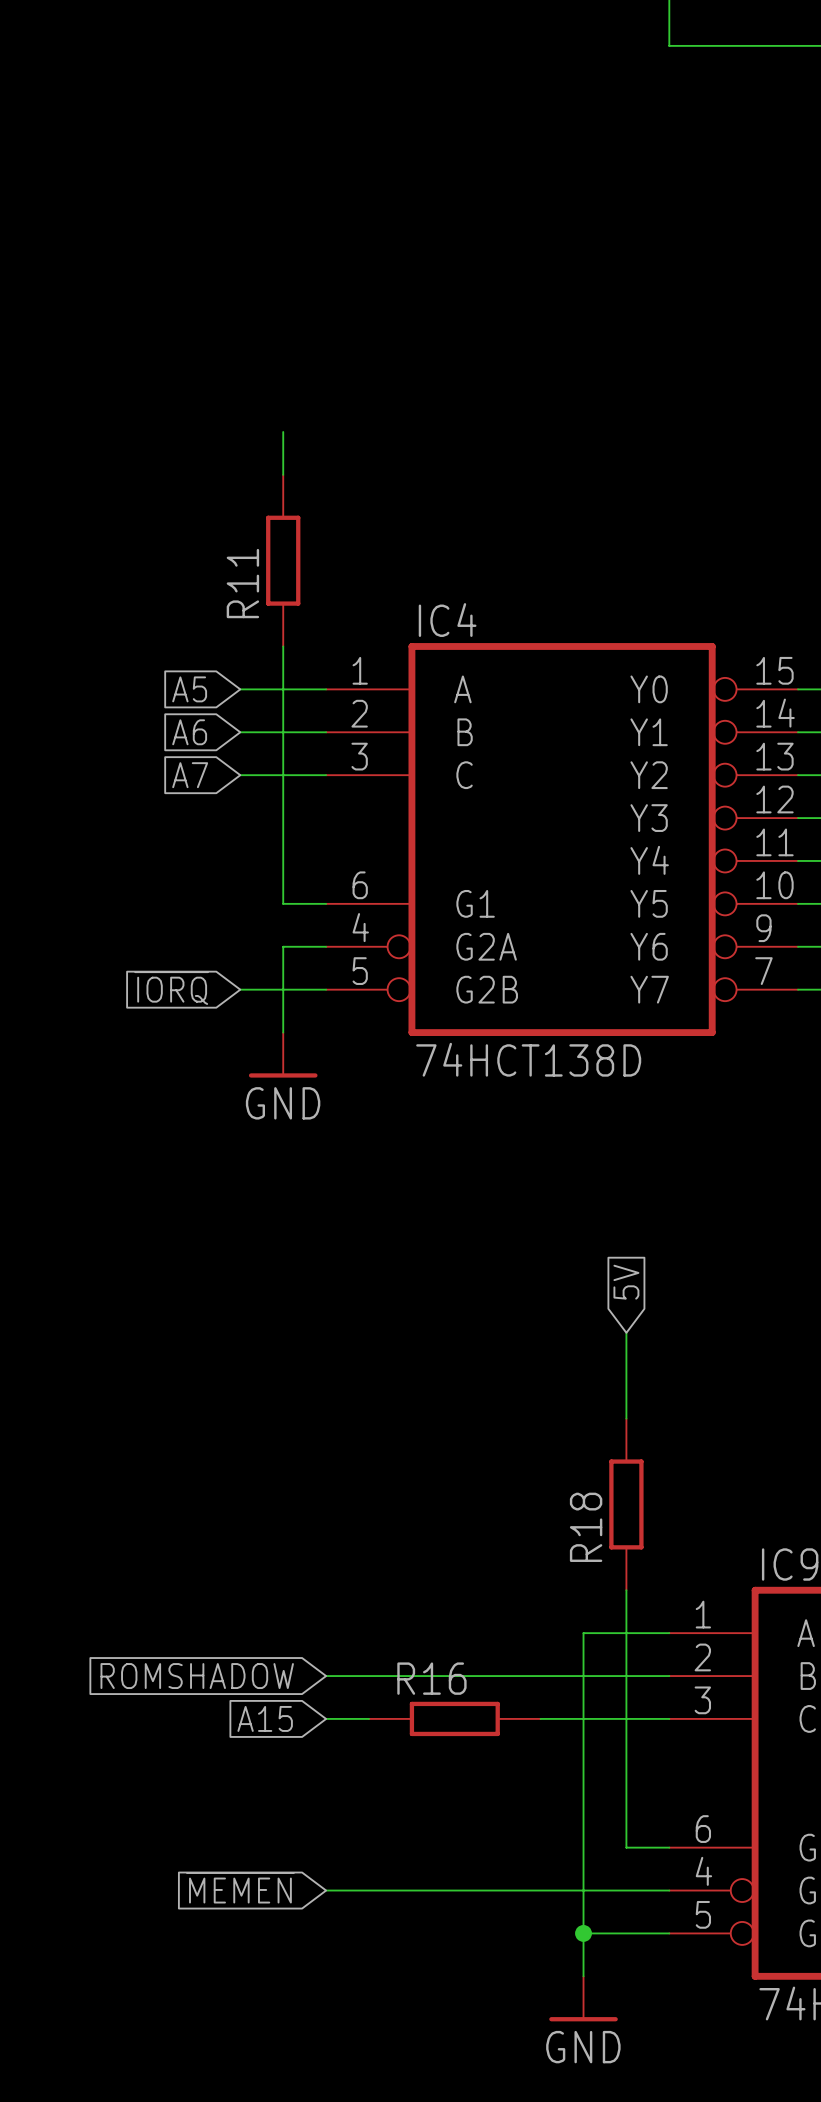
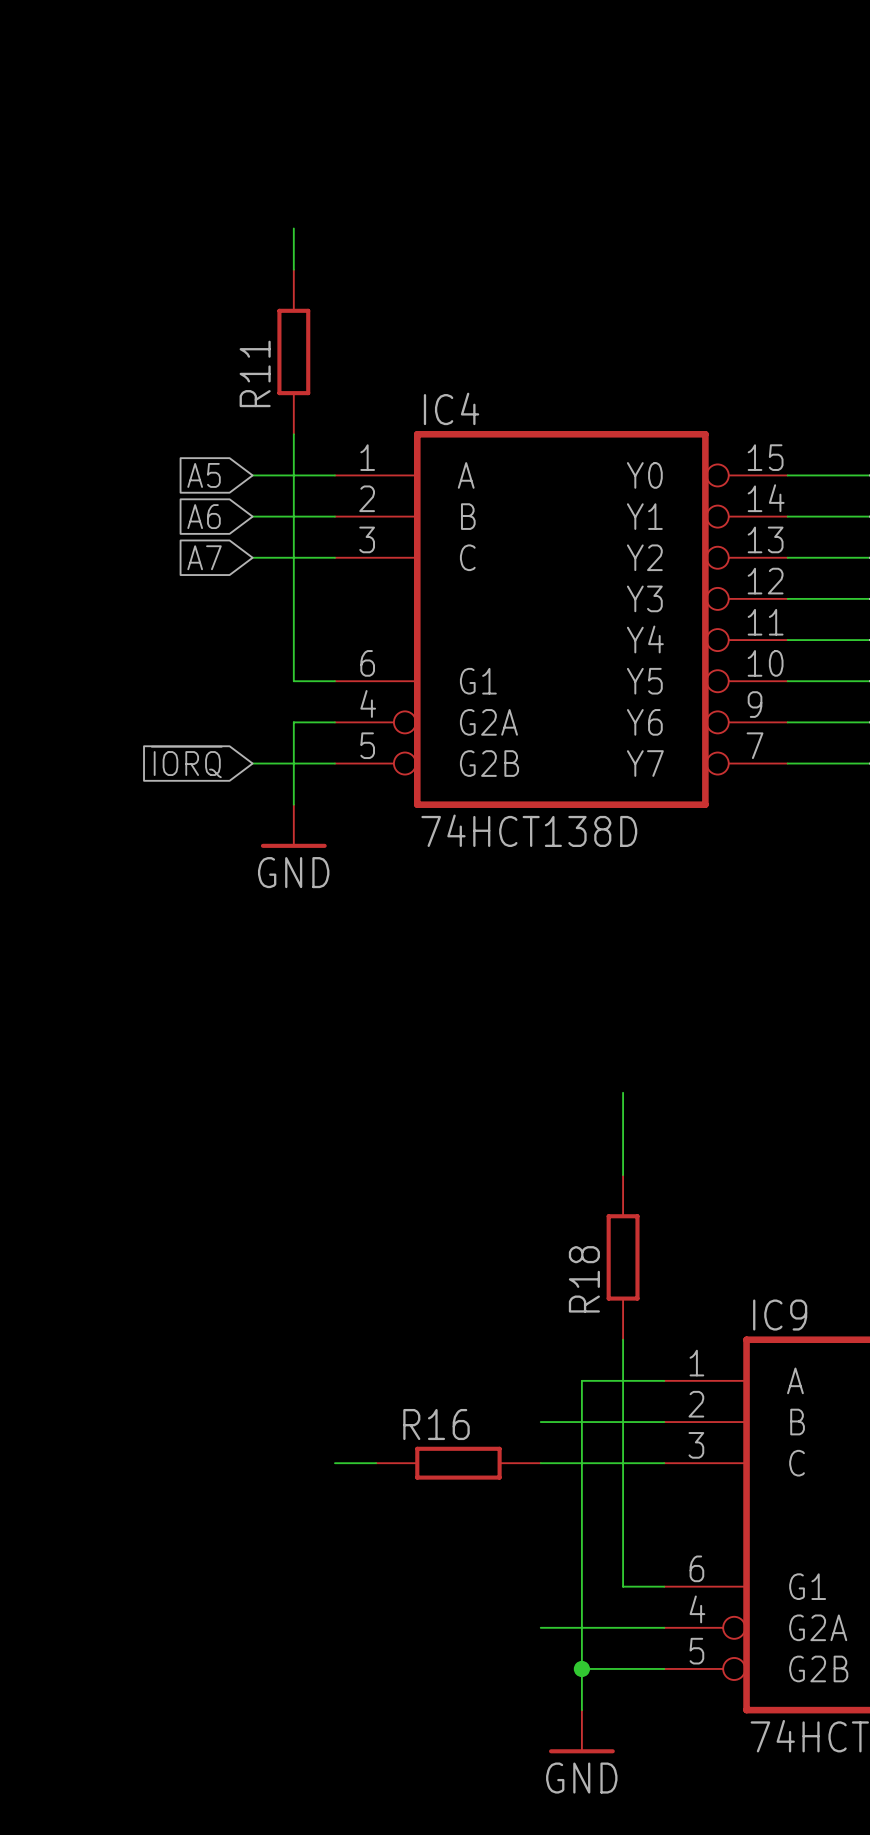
global label: 5V (626, 1282) -> none
global label: ROMSHADOW (197, 1676) -> none
wire: (326, 1676) (540, 1676) -> none
global label: A15 (265, 1718) -> none
global label: ~{MEMEN} (240, 1887) -> none
wire: (326, 1890) (540, 1890) -> none

